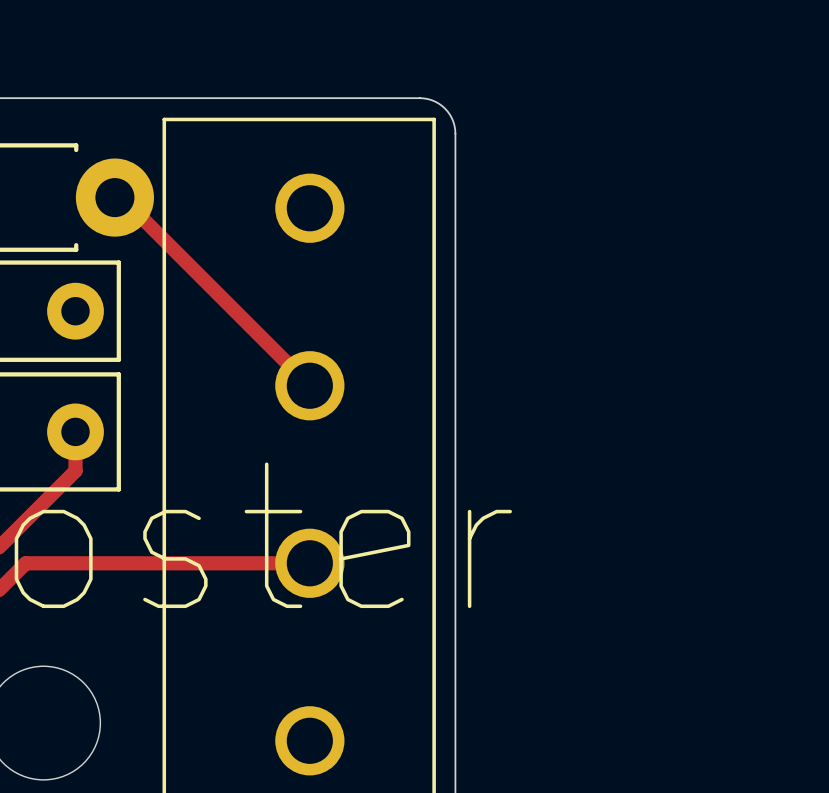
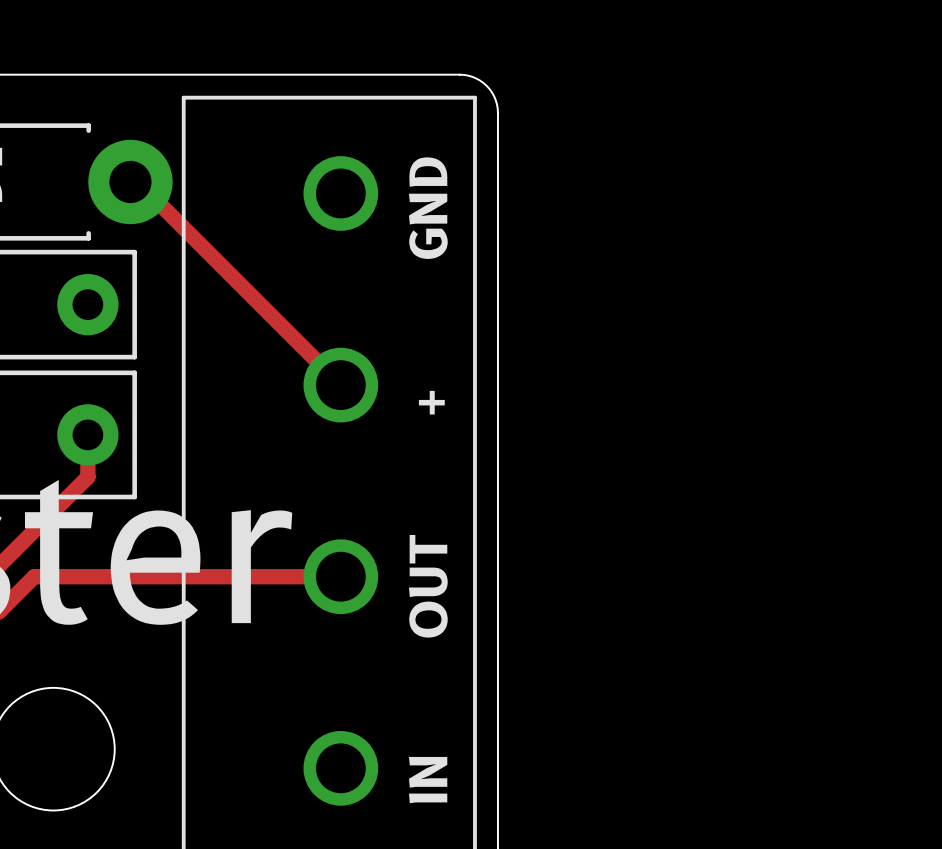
text: none -> GND (428, 208)
text: none -> + (431, 402)
text: none -> OUT (428, 586)
text: none -> IN (428, 780)

